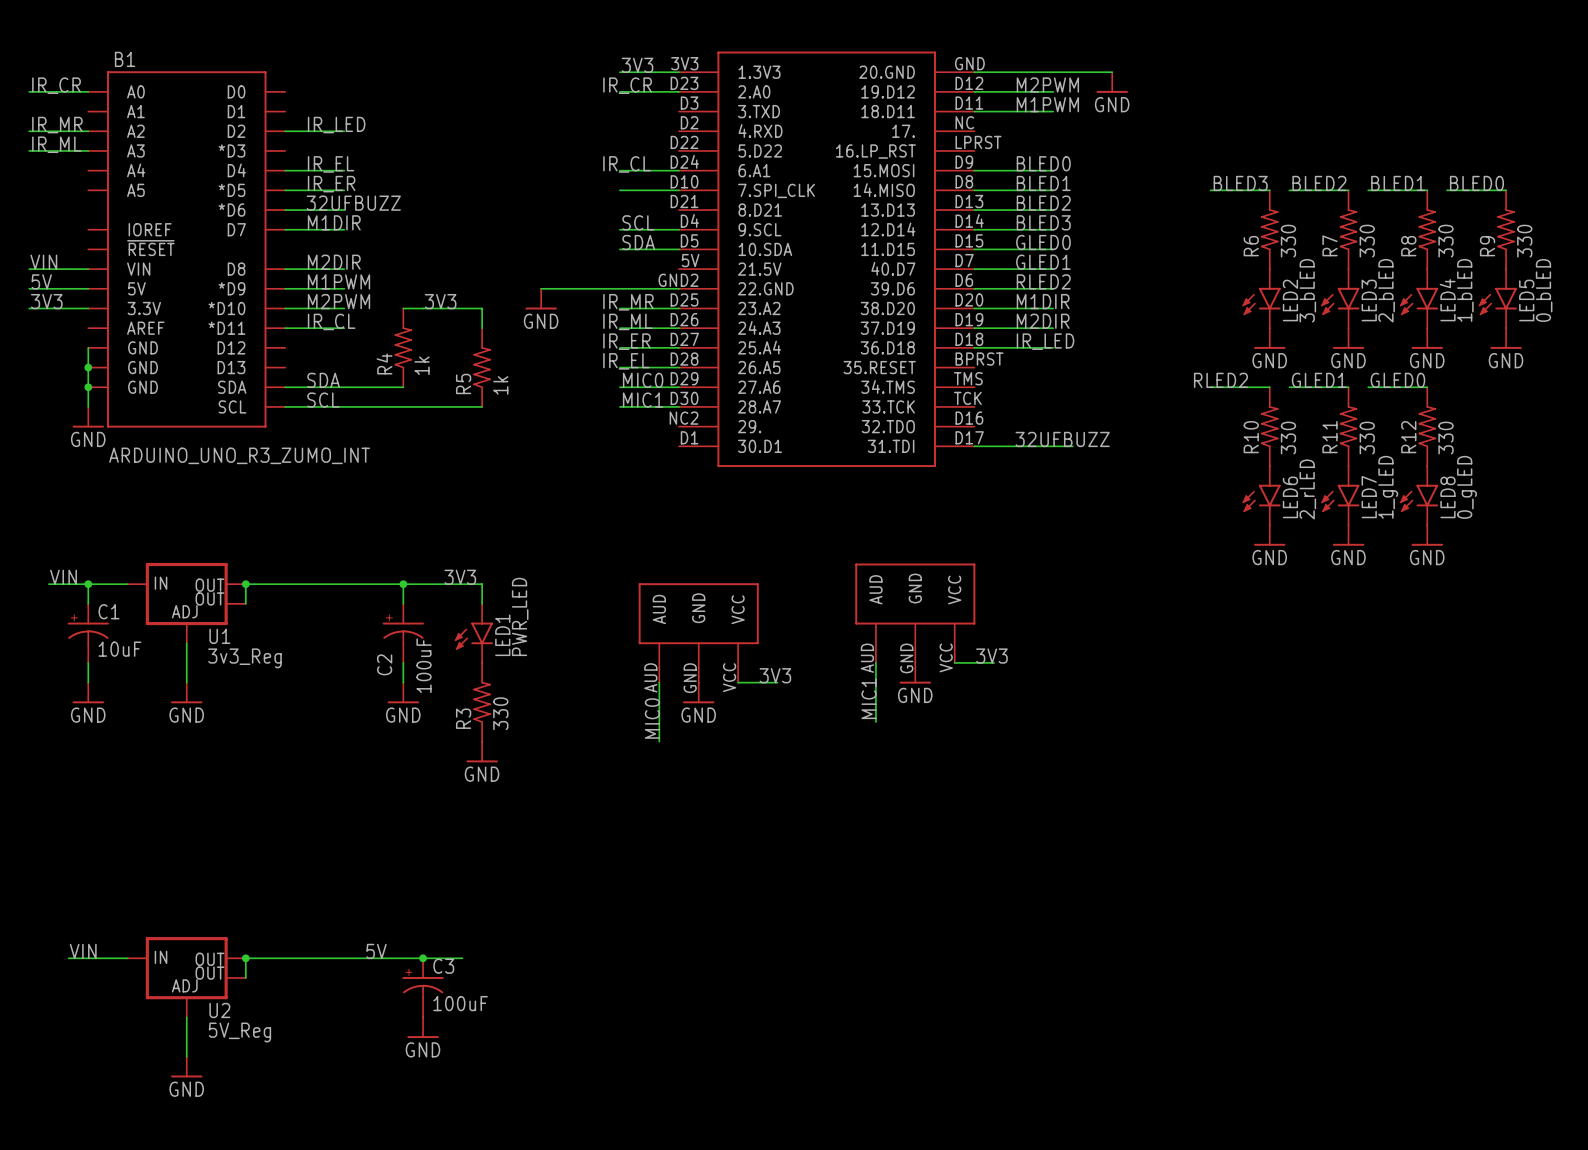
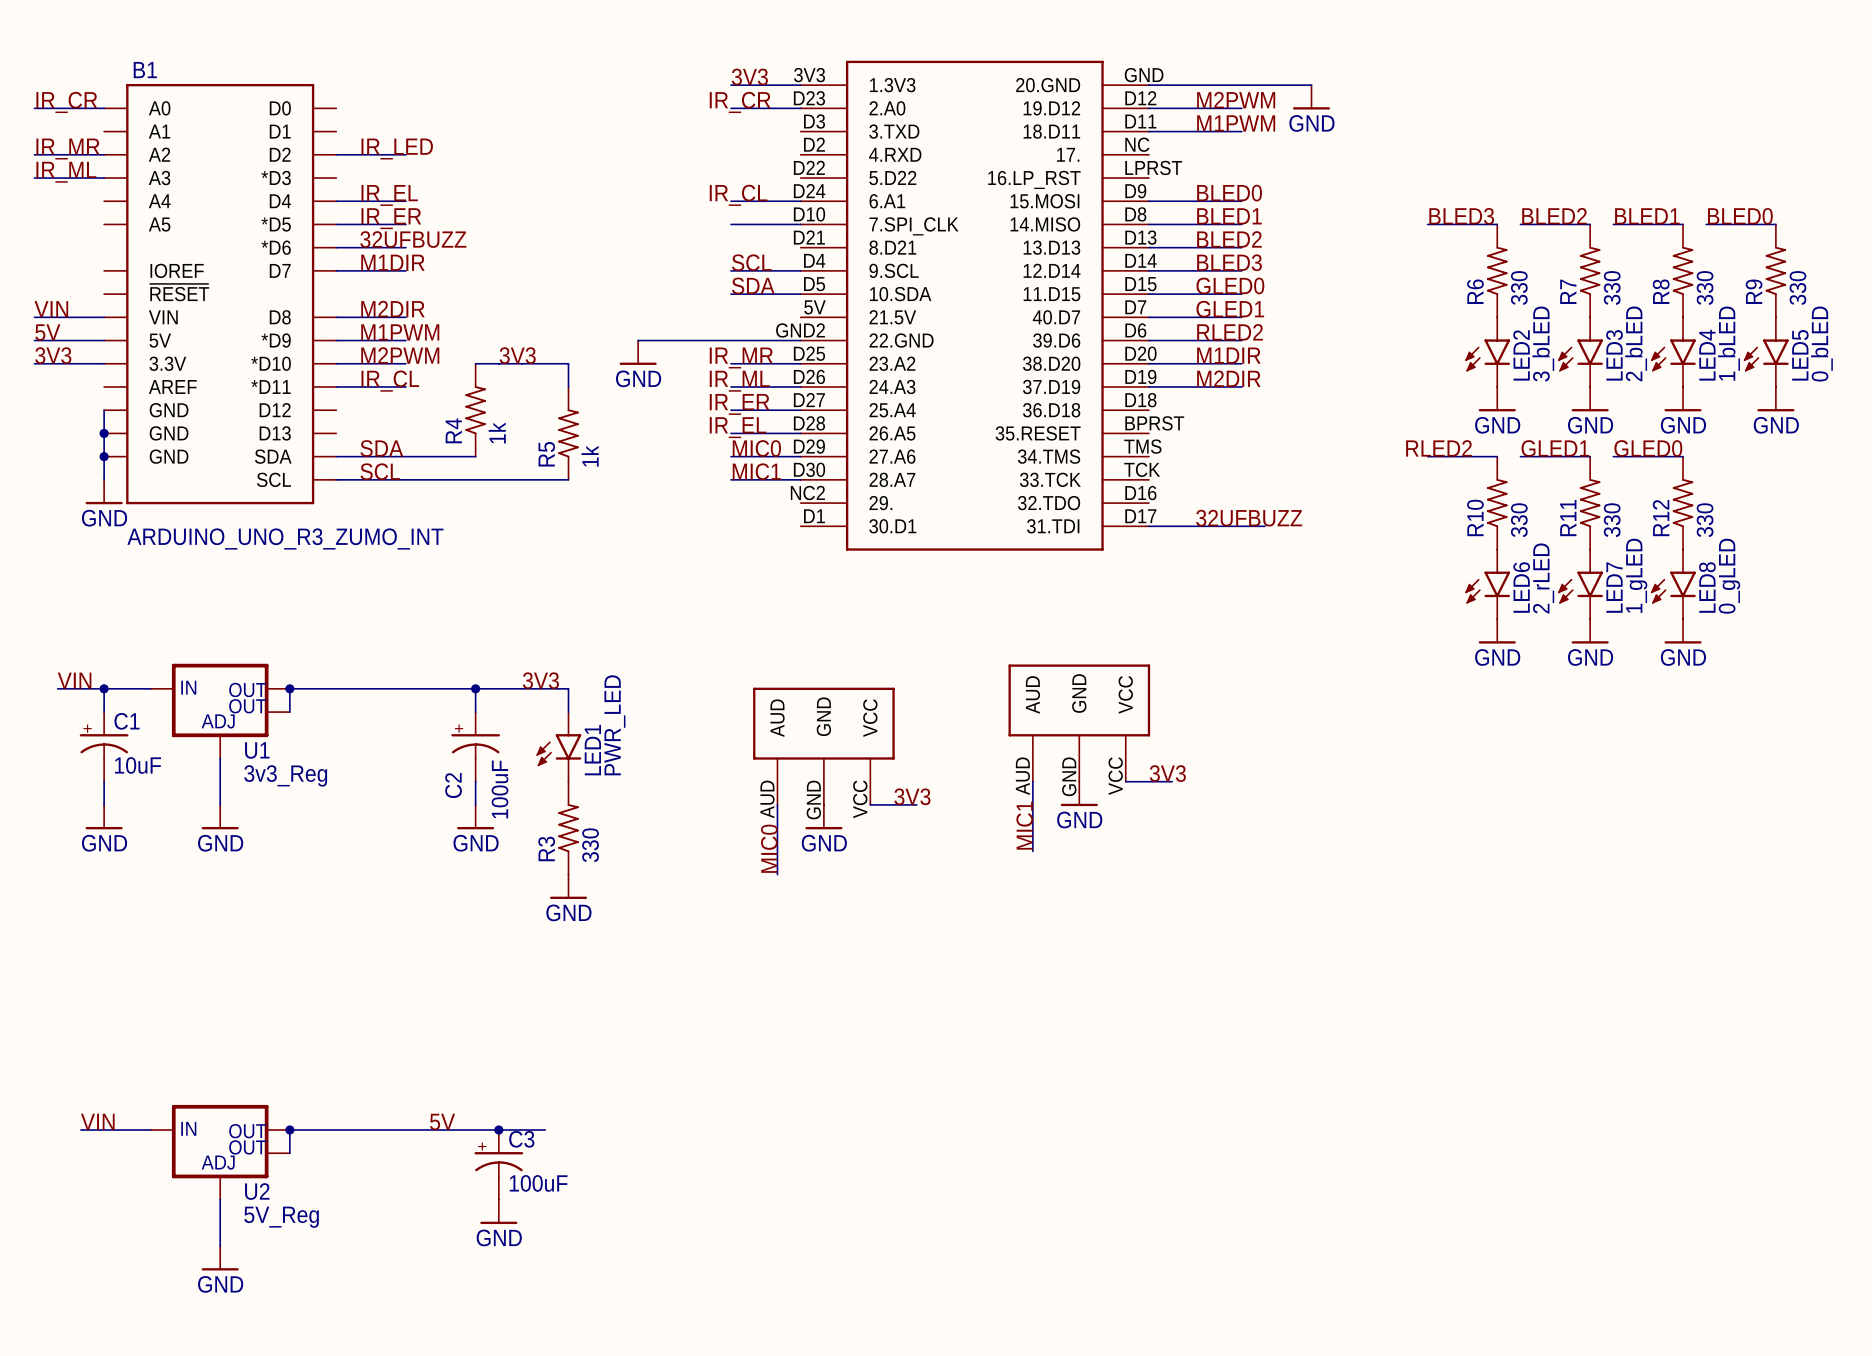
label: IR_LED (1045, 341) -> none
wire: (974, 347) (1053, 347) -> none

